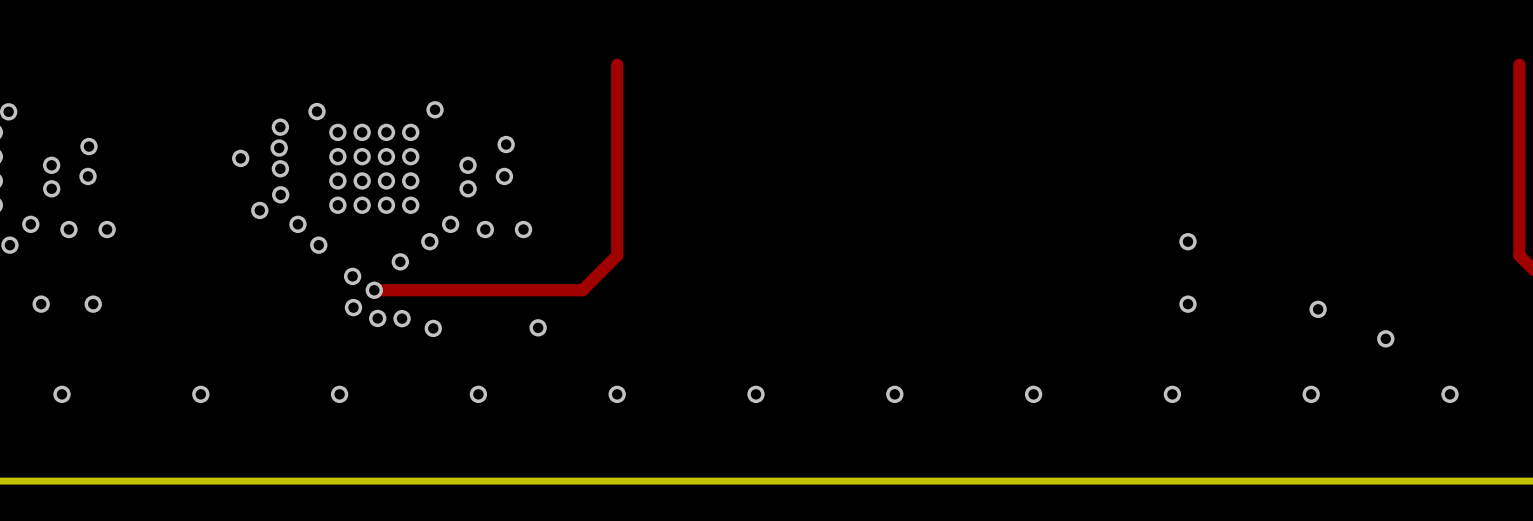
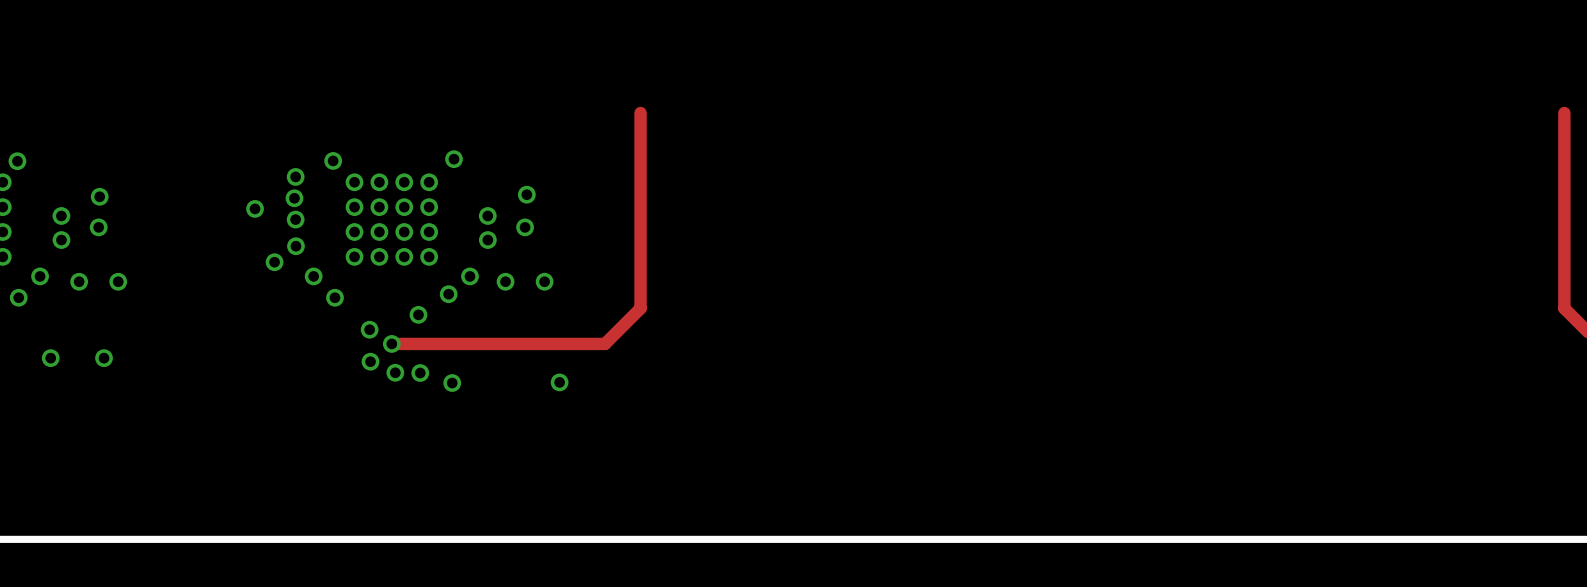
via: (1188, 241) -> none
via: (1188, 304) -> none
via: (1318, 309) -> none
via: (1385, 338) -> none
via: (62, 394) -> none
via: (200, 394) -> none
via: (339, 394) -> none
via: (478, 394) -> none
via: (617, 394) -> none
via: (755, 394) -> none
via: (894, 394) -> none
via: (1033, 394) -> none
via: (1172, 394) -> none
via: (1311, 394) -> none
via: (1449, 394) -> none

